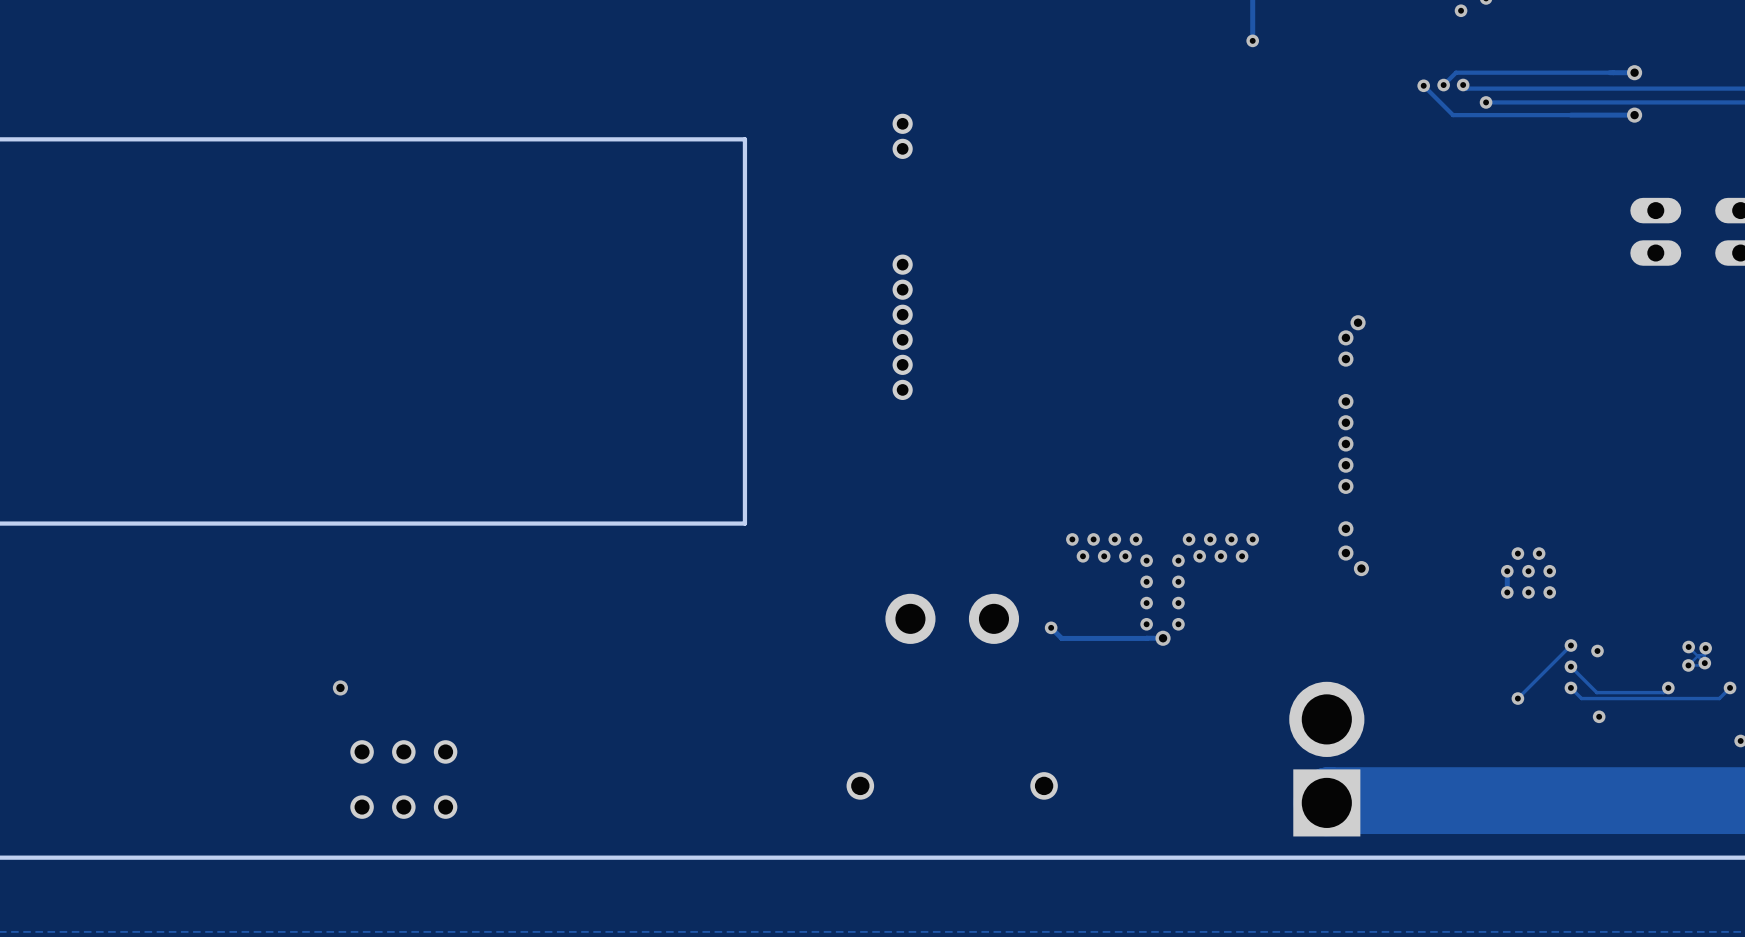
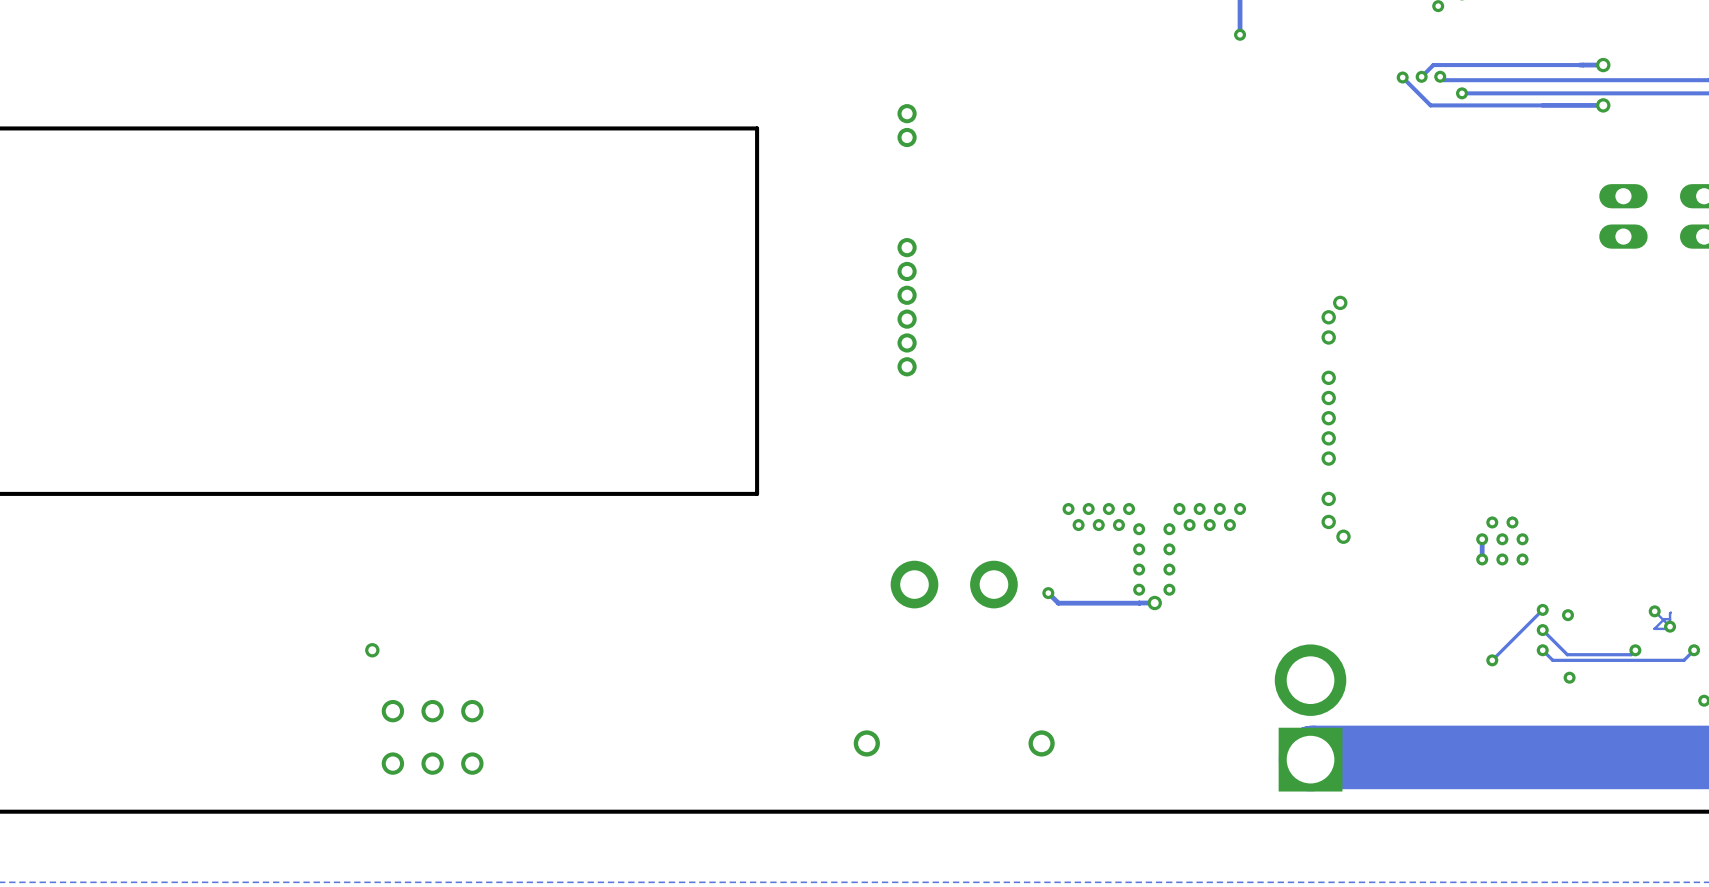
via: (1705, 648) -> none
via: (1688, 665) -> none

